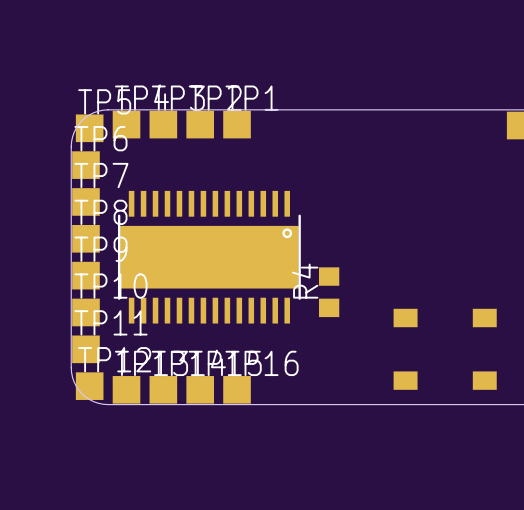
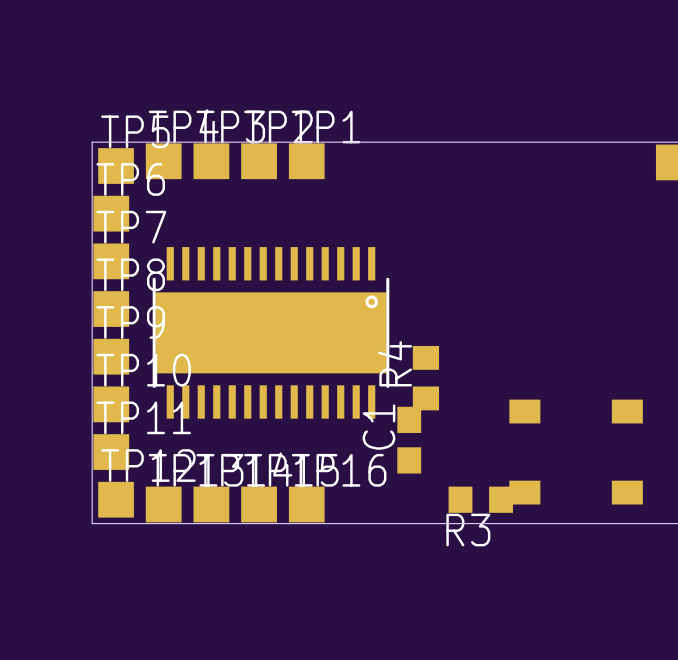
board edge: (108, 109) (93, 112) (82, 120) (74, 132) (71, 146) -> (139, 142) (92, 142) (92, 189)
C1: none -> (409, 440)
board edge: (71, 367) (74, 381) (82, 393) (93, 401) (108, 404) -> (92, 475) (92, 523) (139, 523)
R3: none -> (480, 499)

